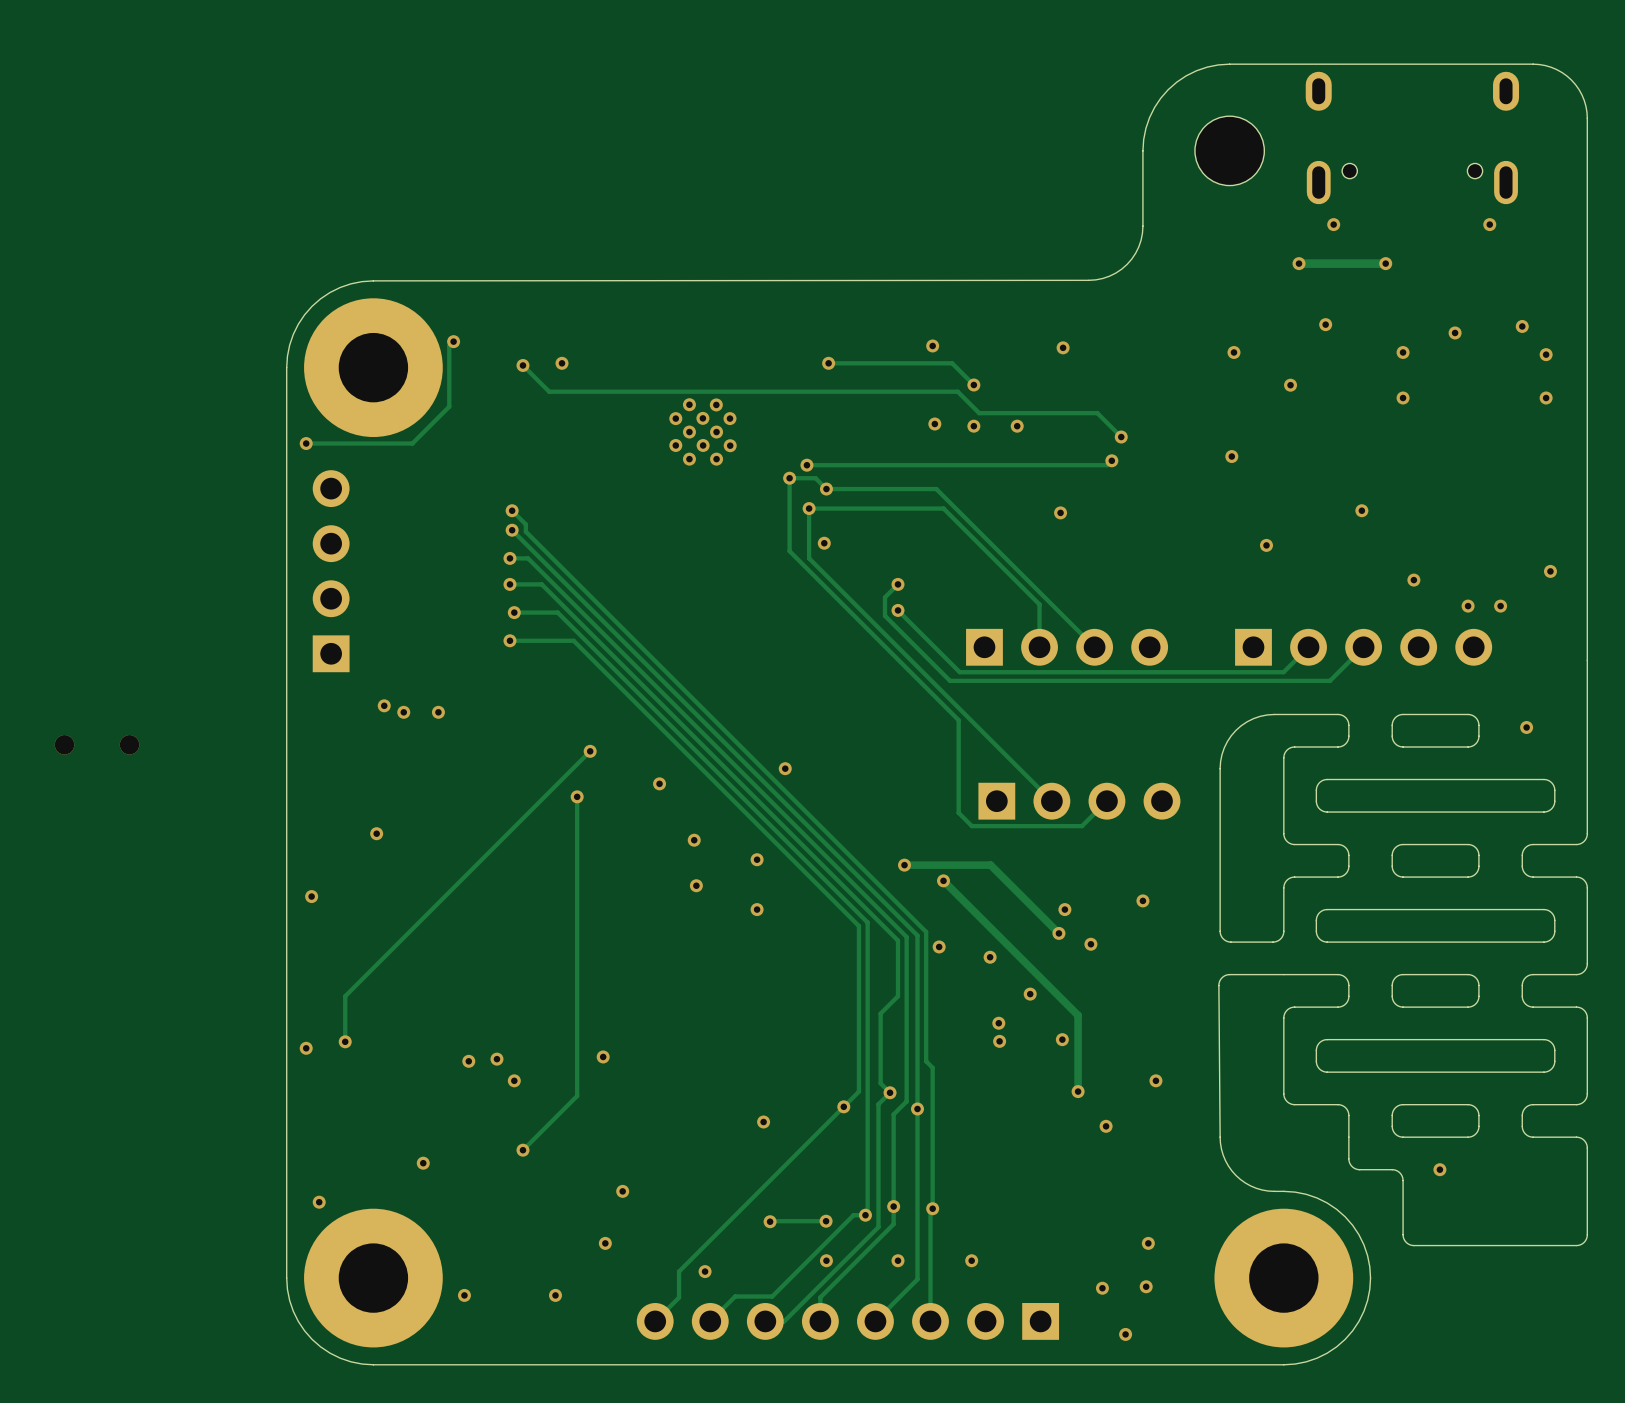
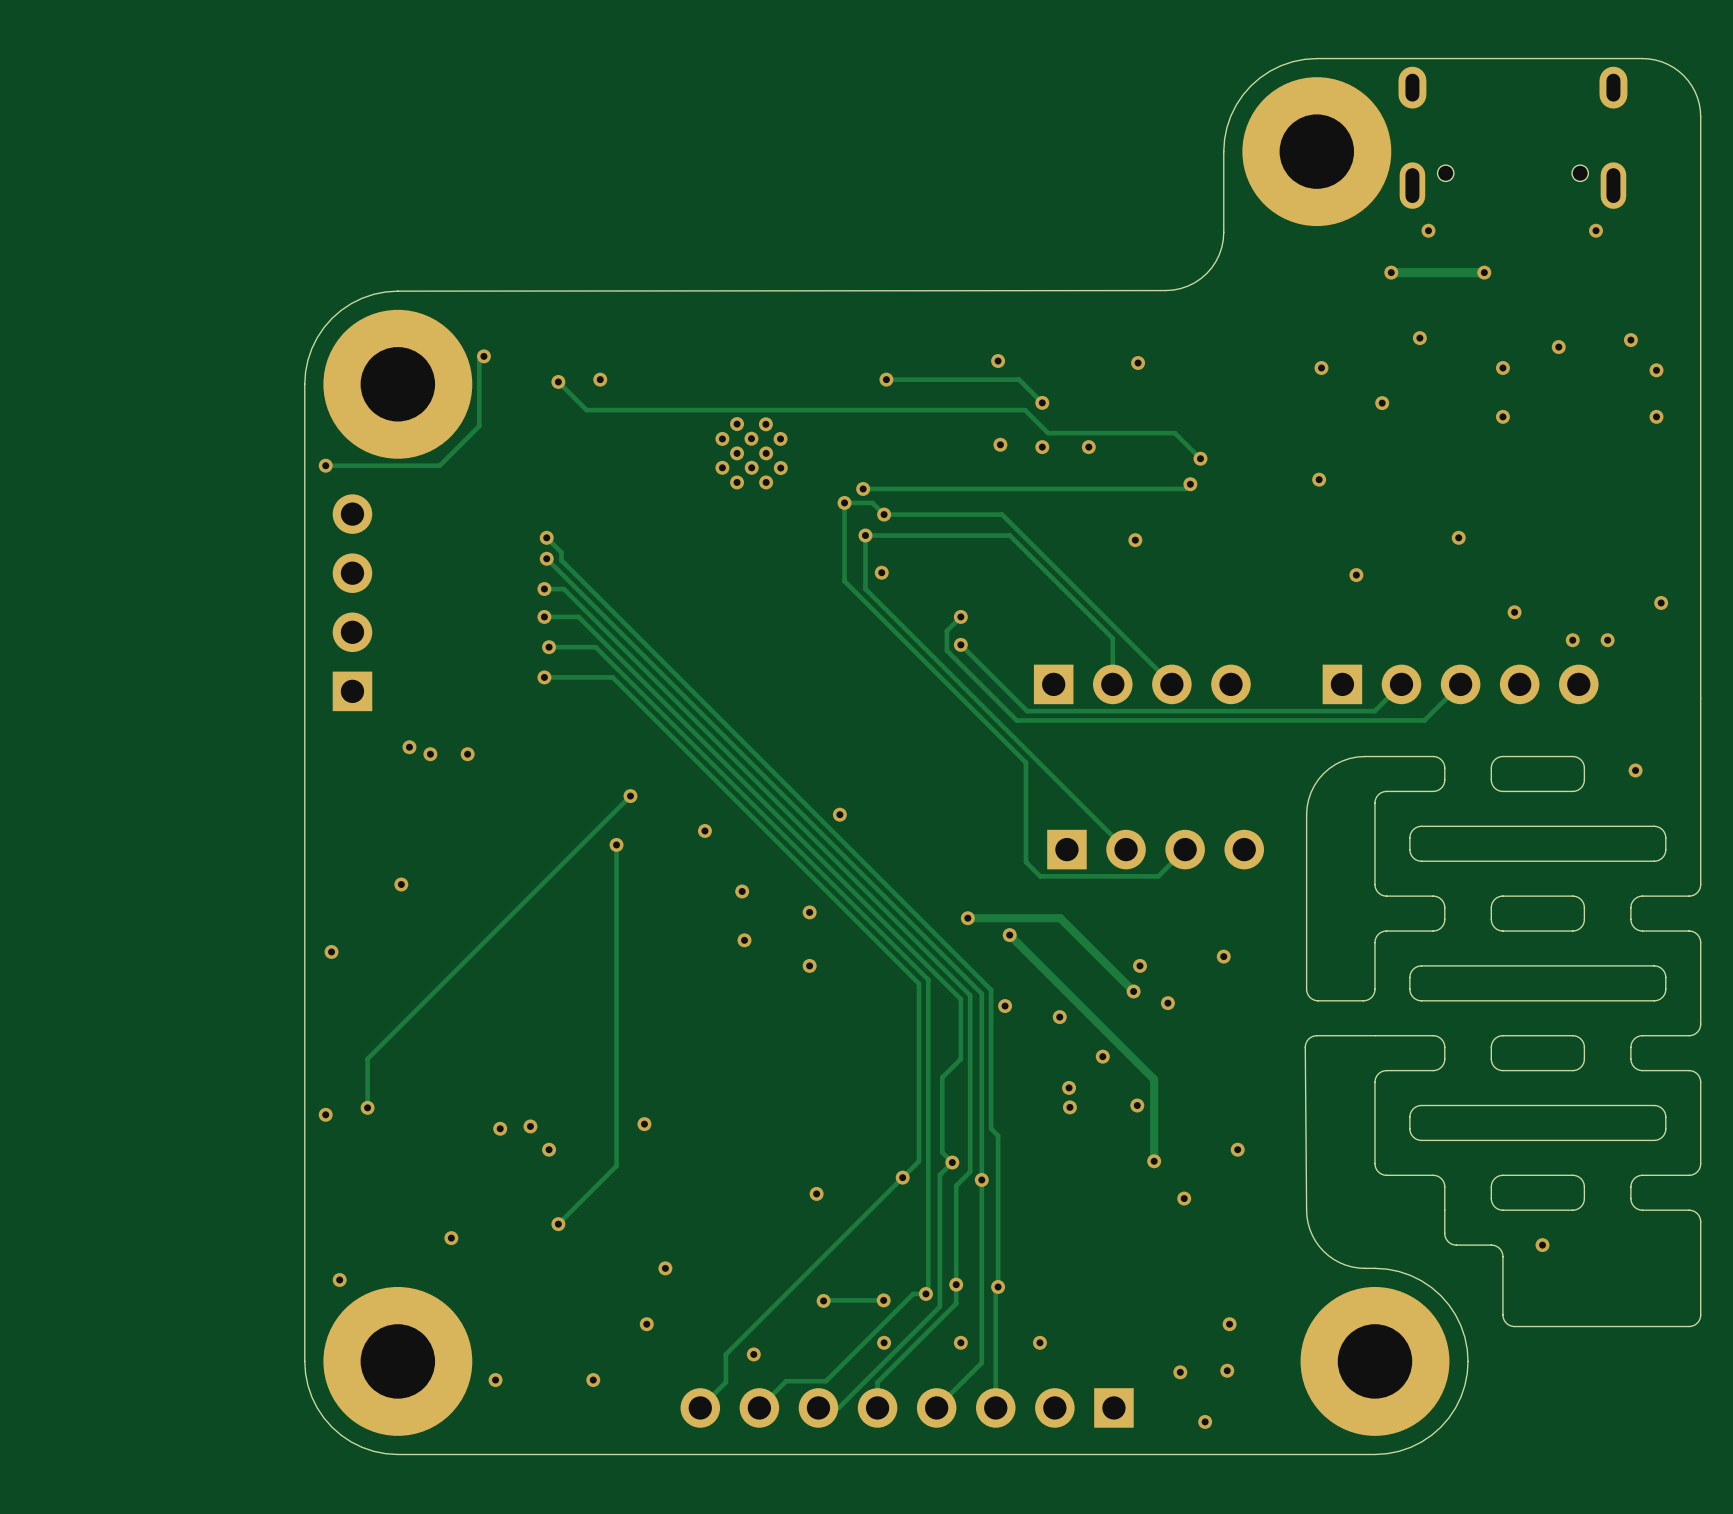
part footprint: [1194, 116, 1265, 186] -> [1242, 77, 1392, 227]
part: (97, 744) -> none

